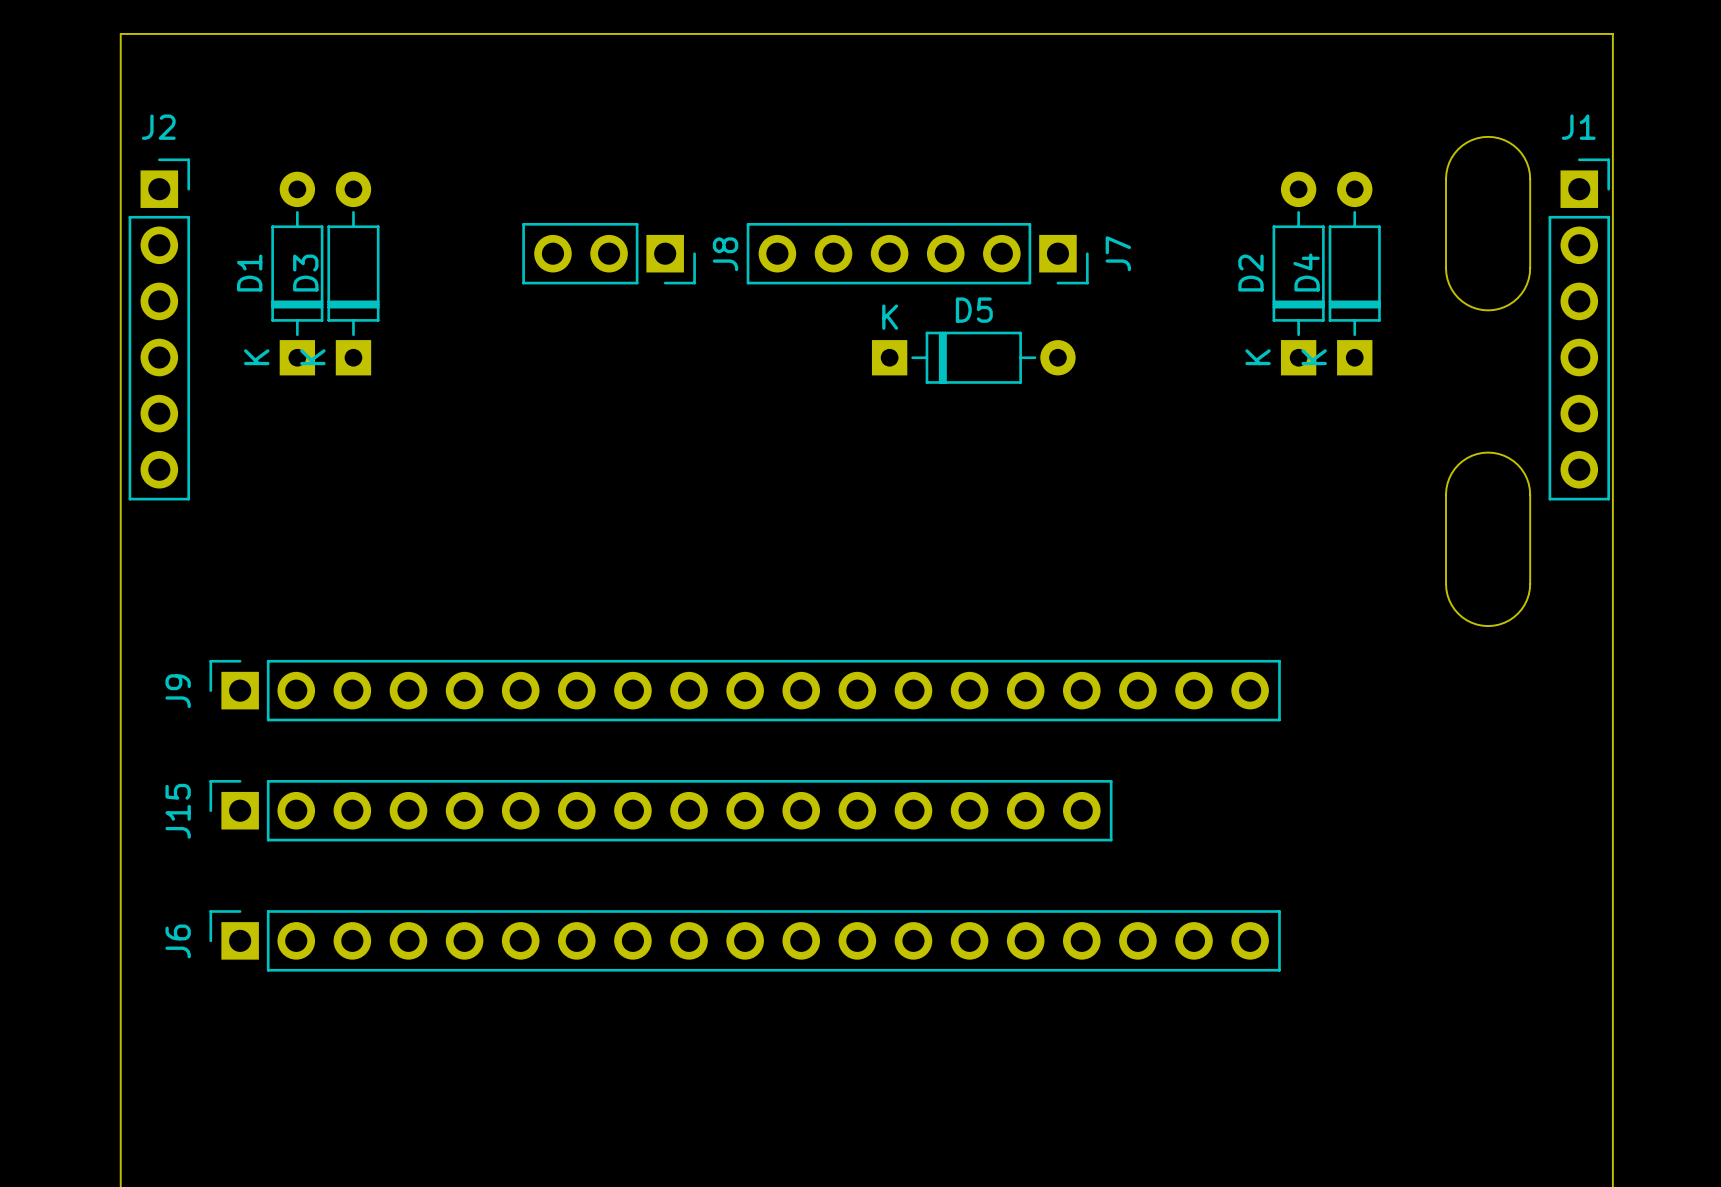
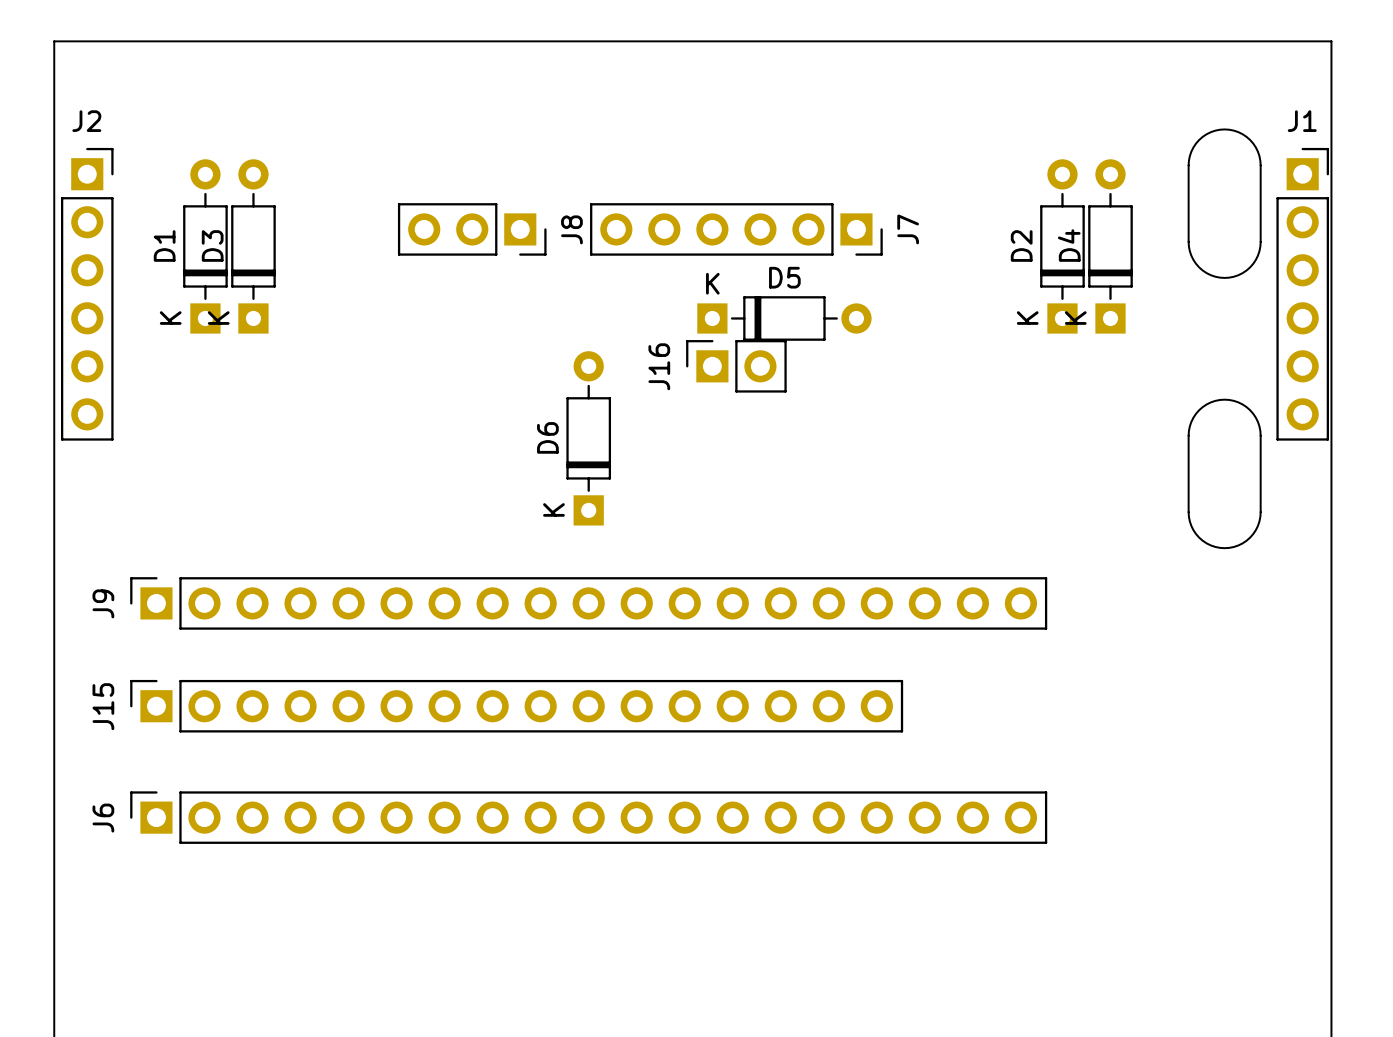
J16: none -> (736, 366)
D6: none -> (588, 438)

